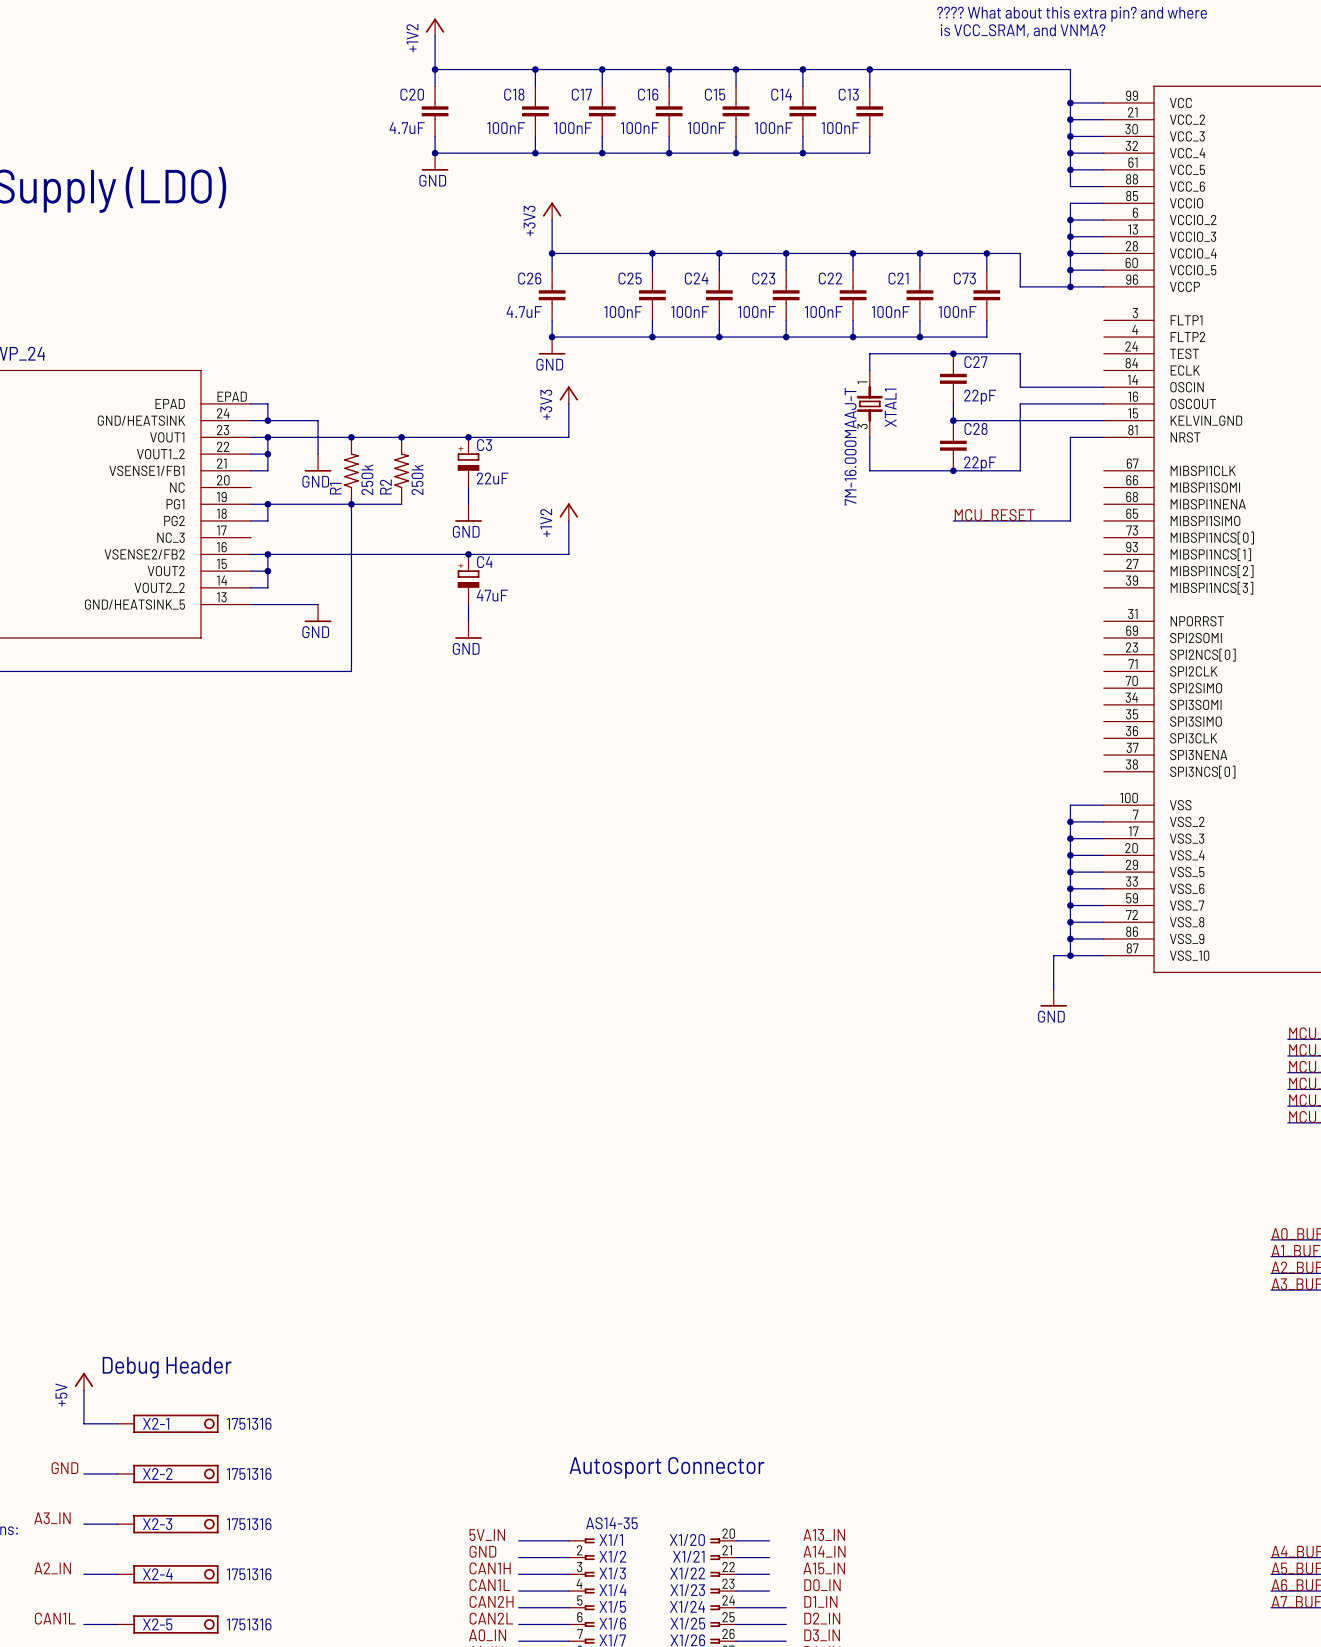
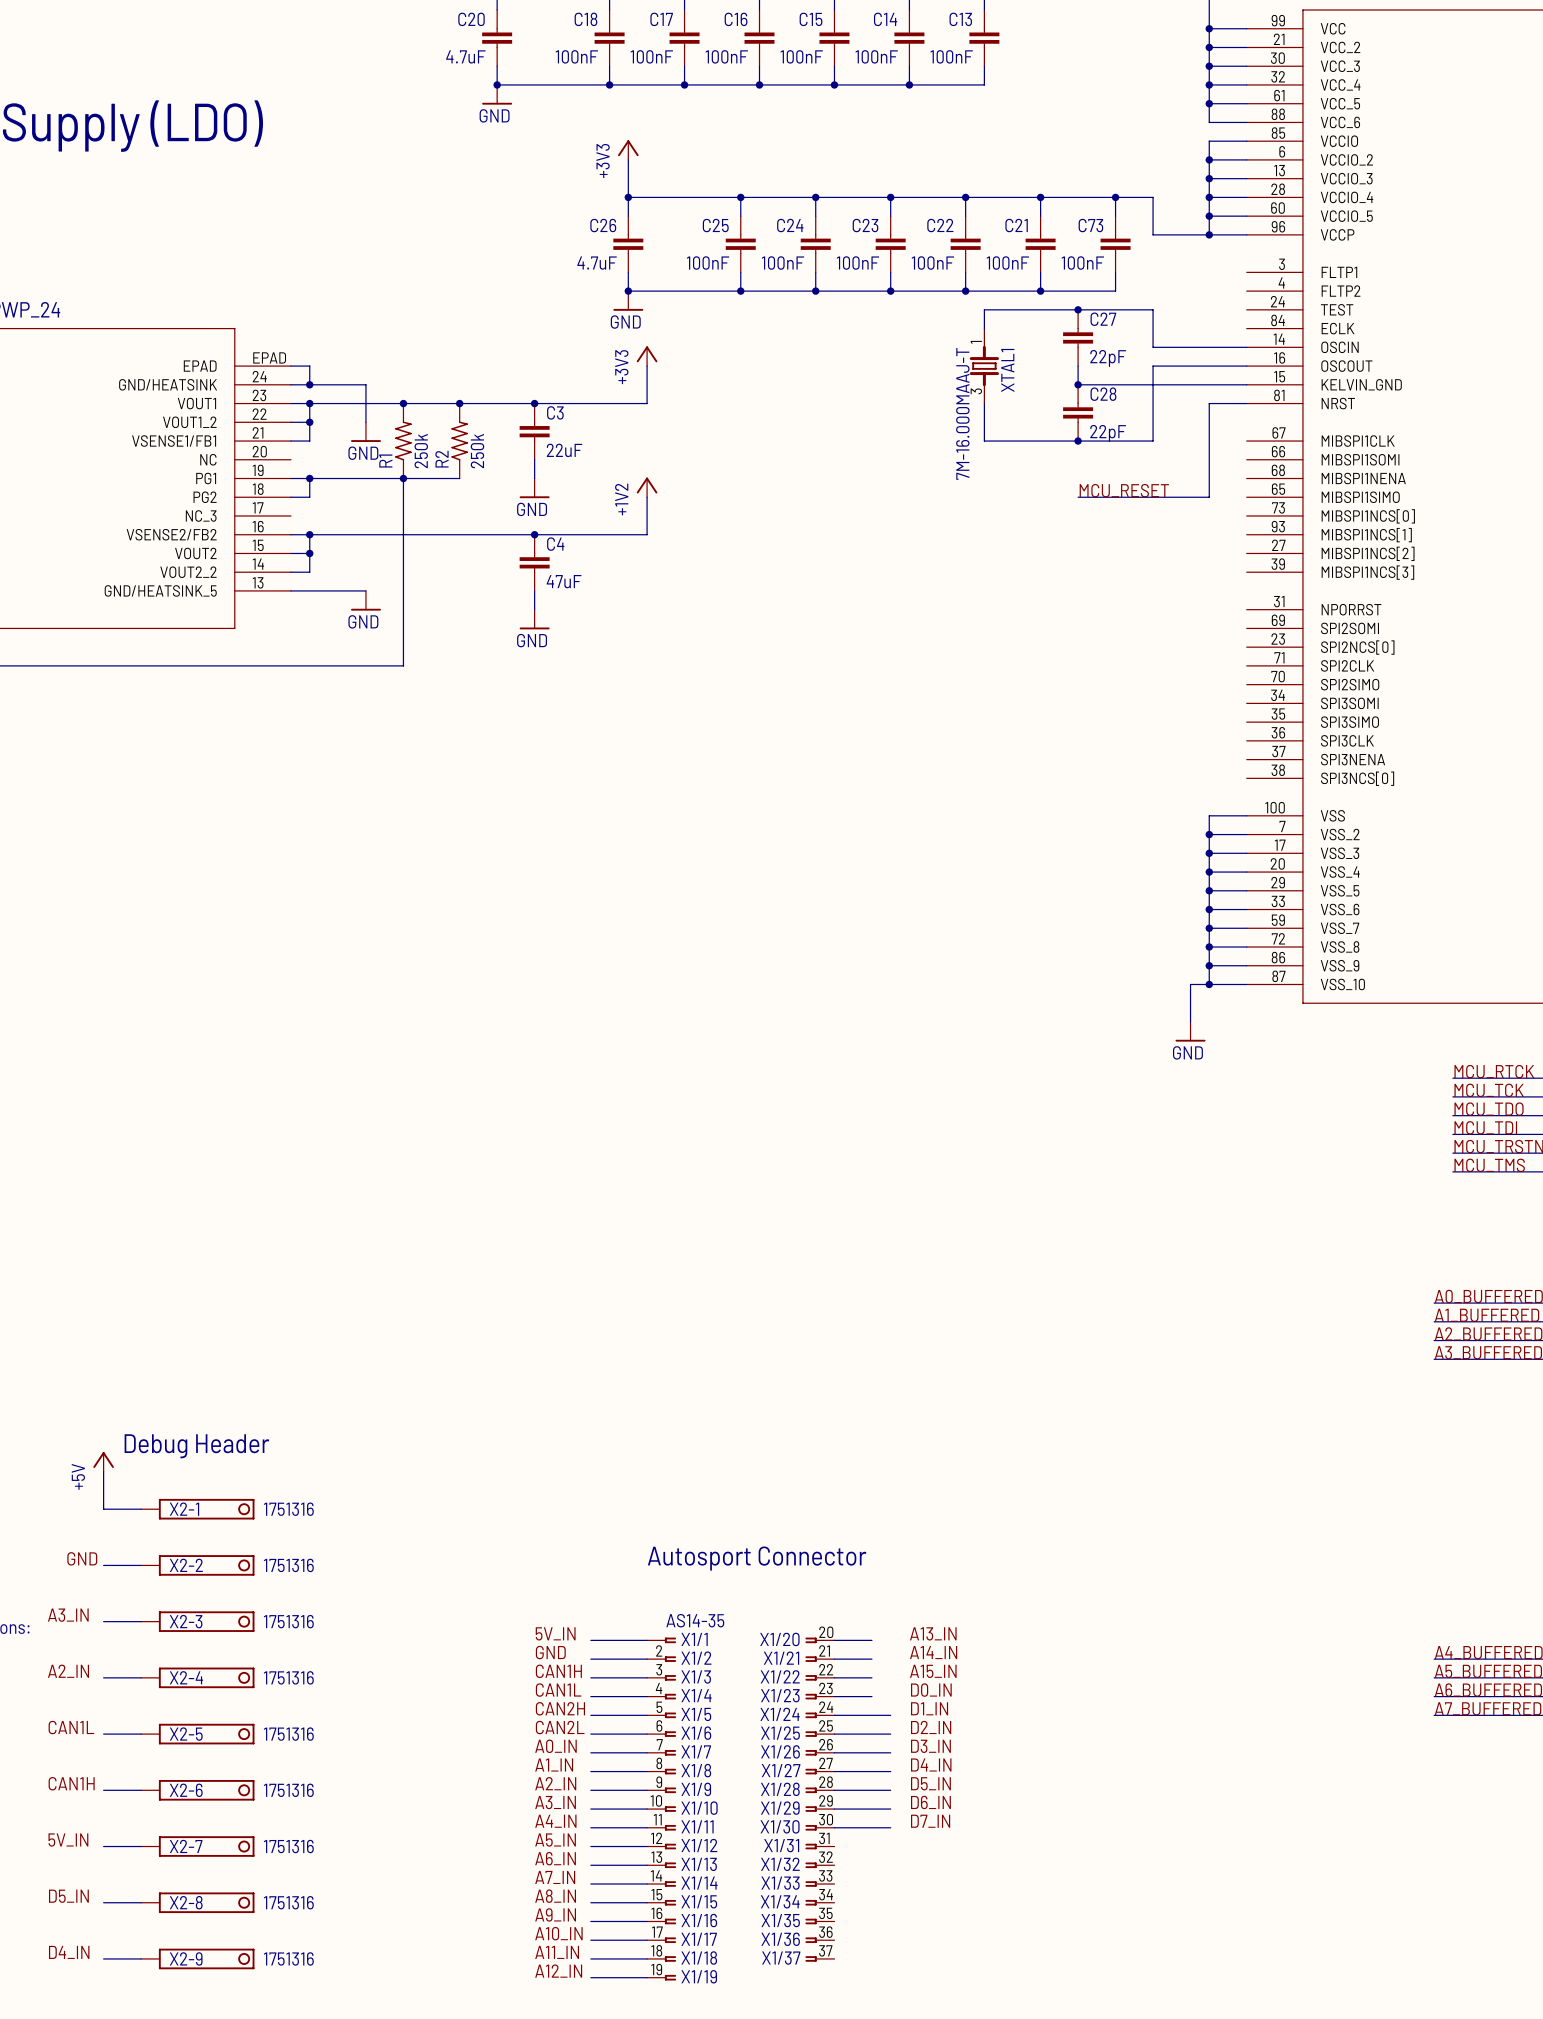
C3 symbol: [457, 437, 480, 488] -> [519, 403, 550, 460]
C4 symbol: [457, 554, 480, 605] -> [519, 534, 550, 591]

